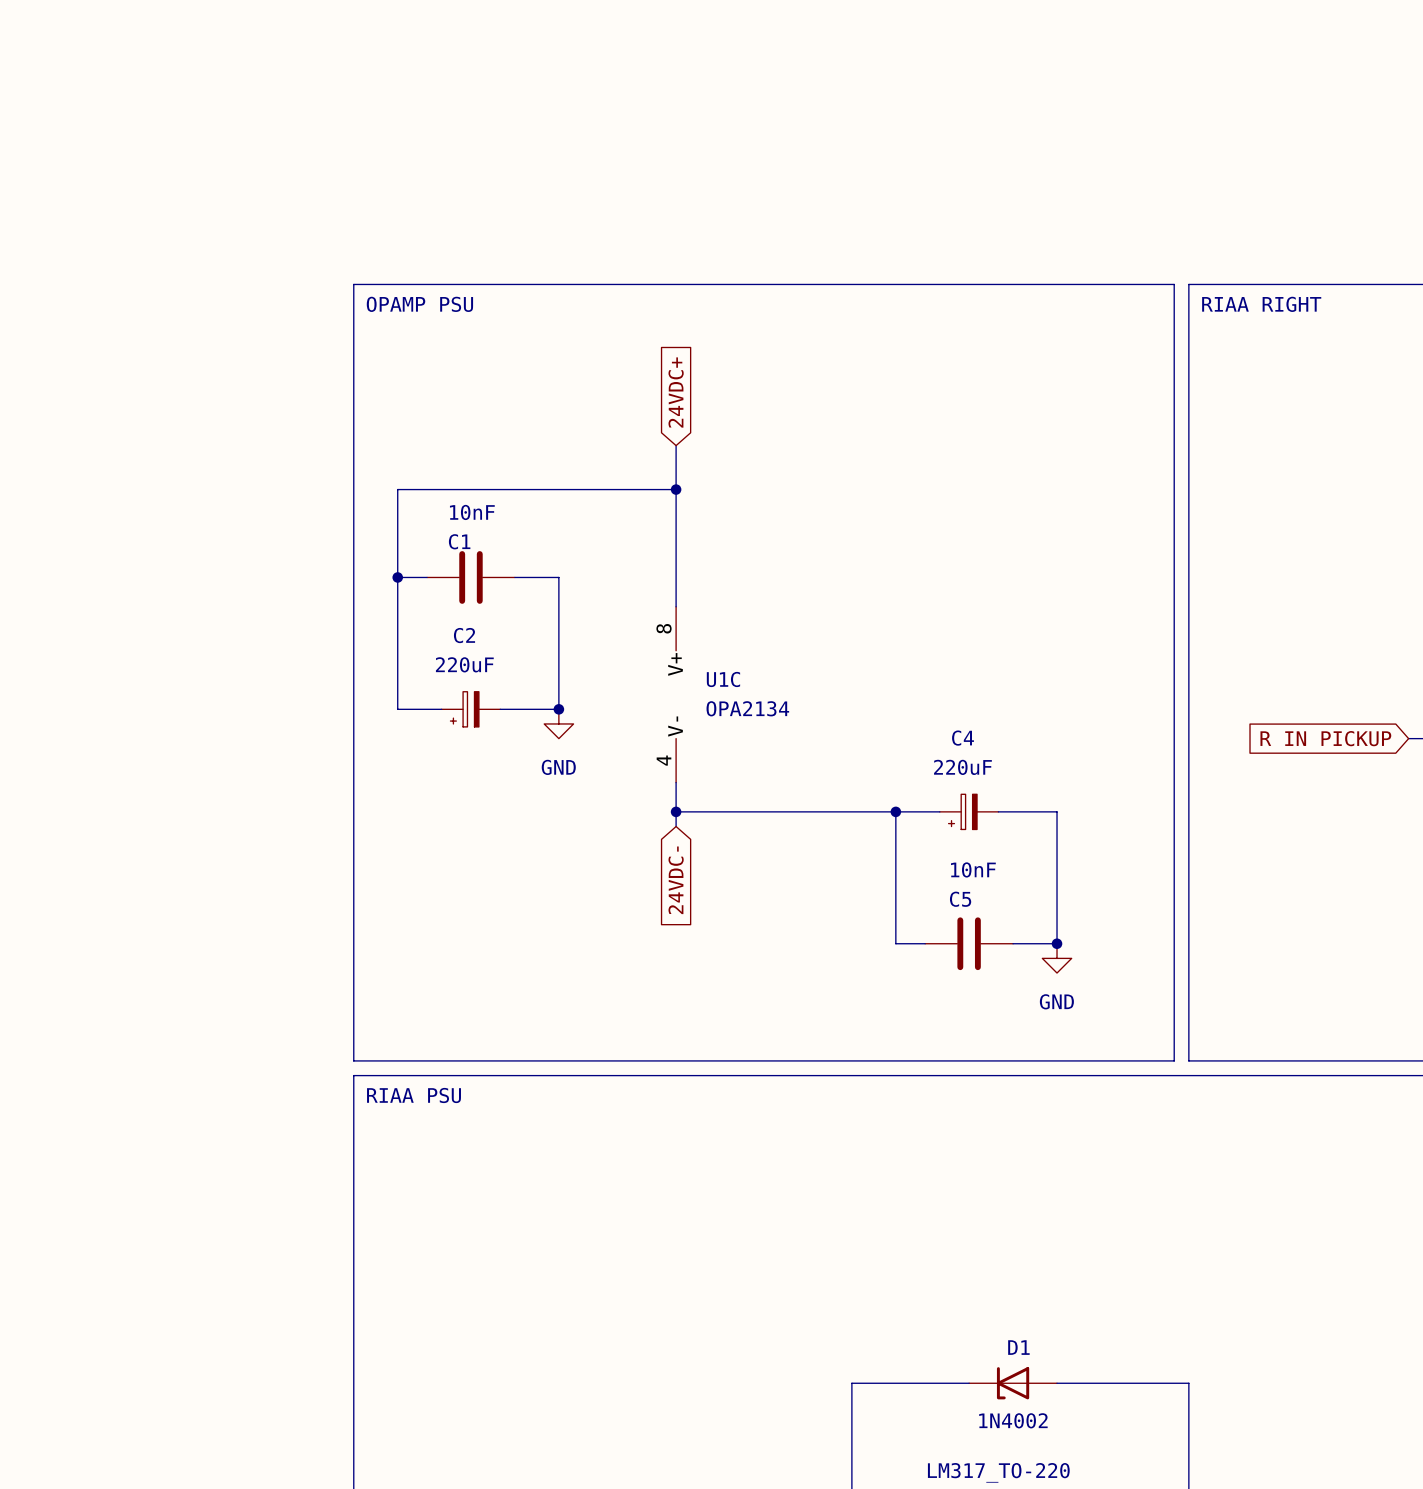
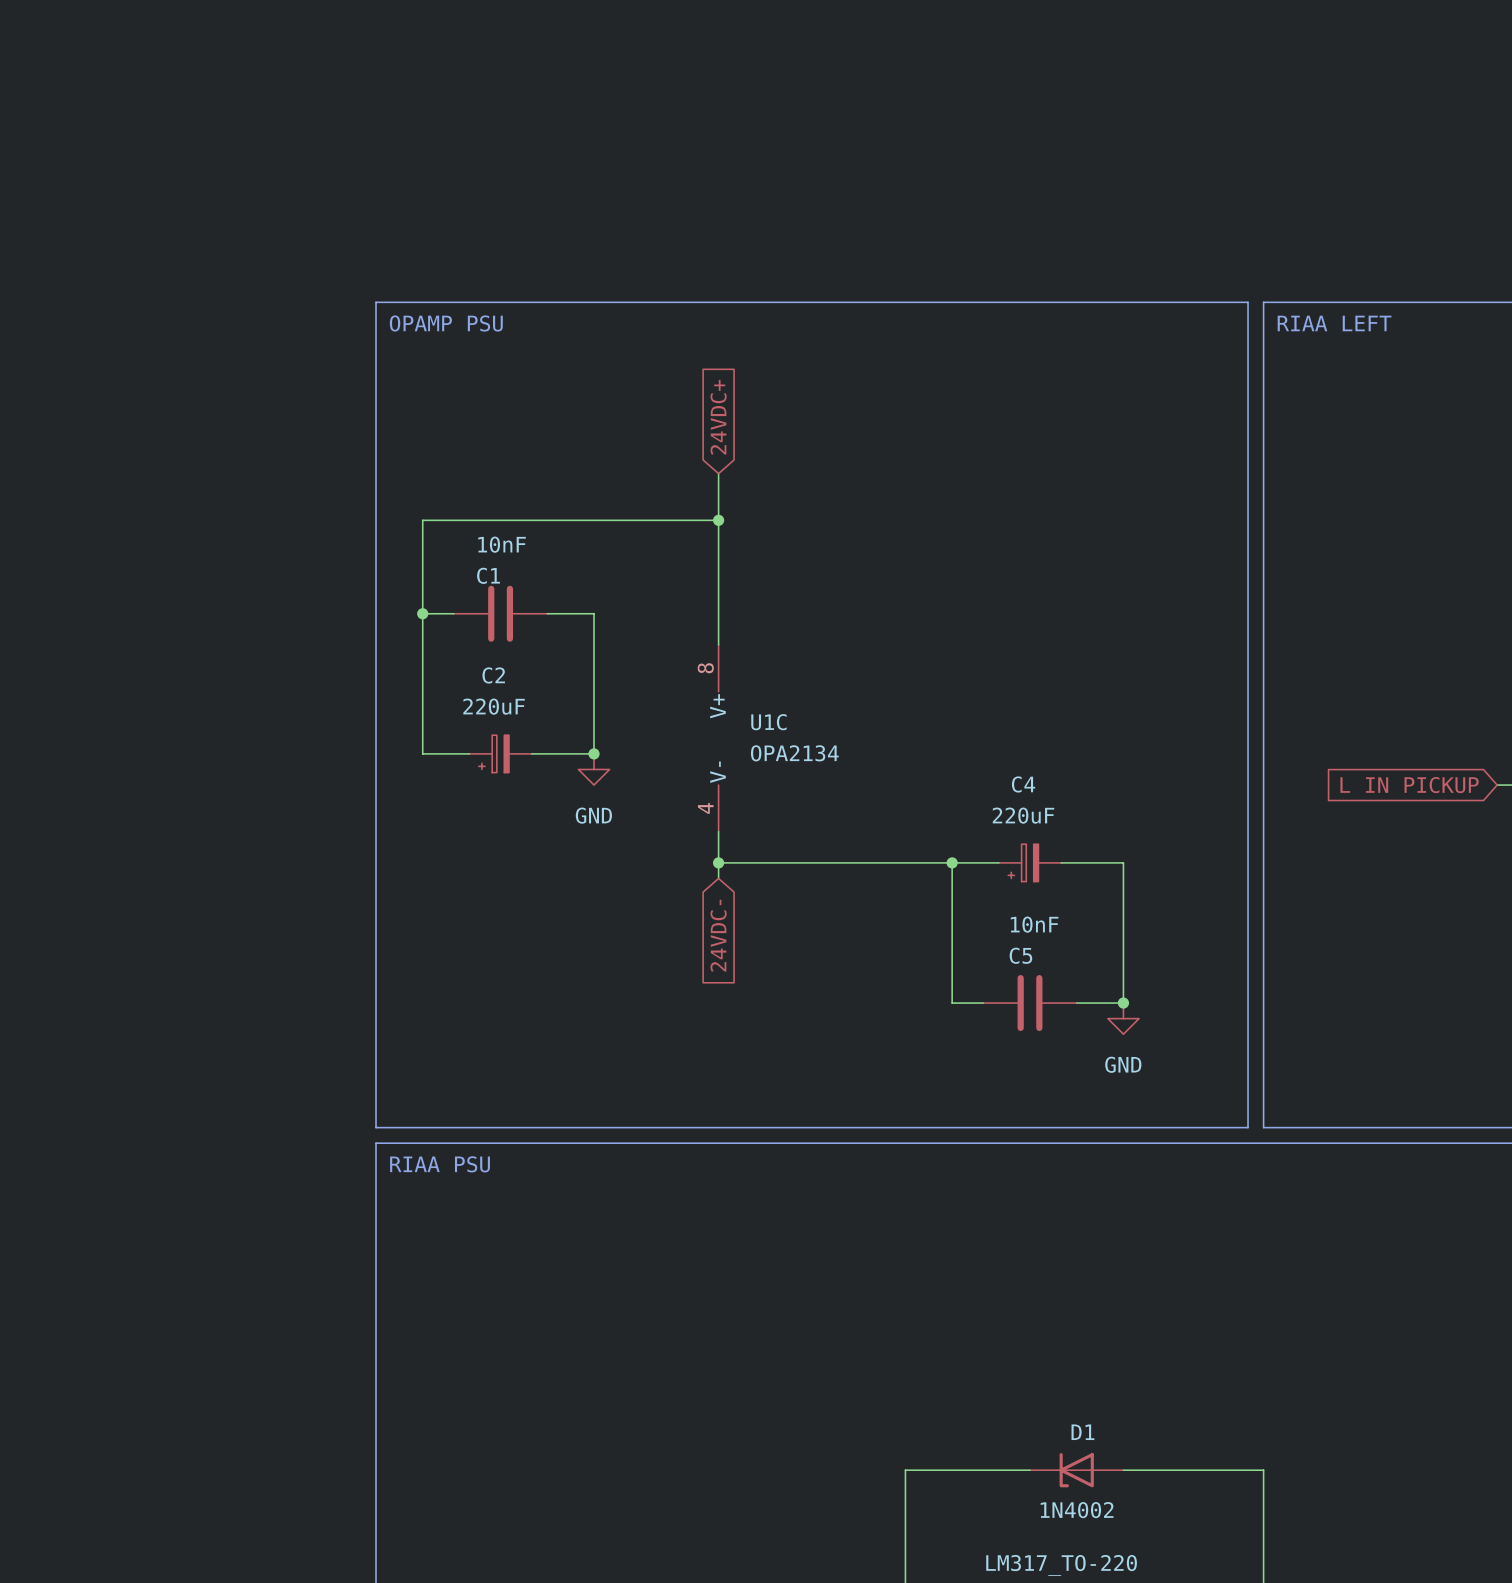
text: RIAA RIGHT (1261, 304) -> RIAA LEFT (1334, 323)
global label: R IN PICKUP (1325, 738) -> L IN PICKUP (1409, 785)

